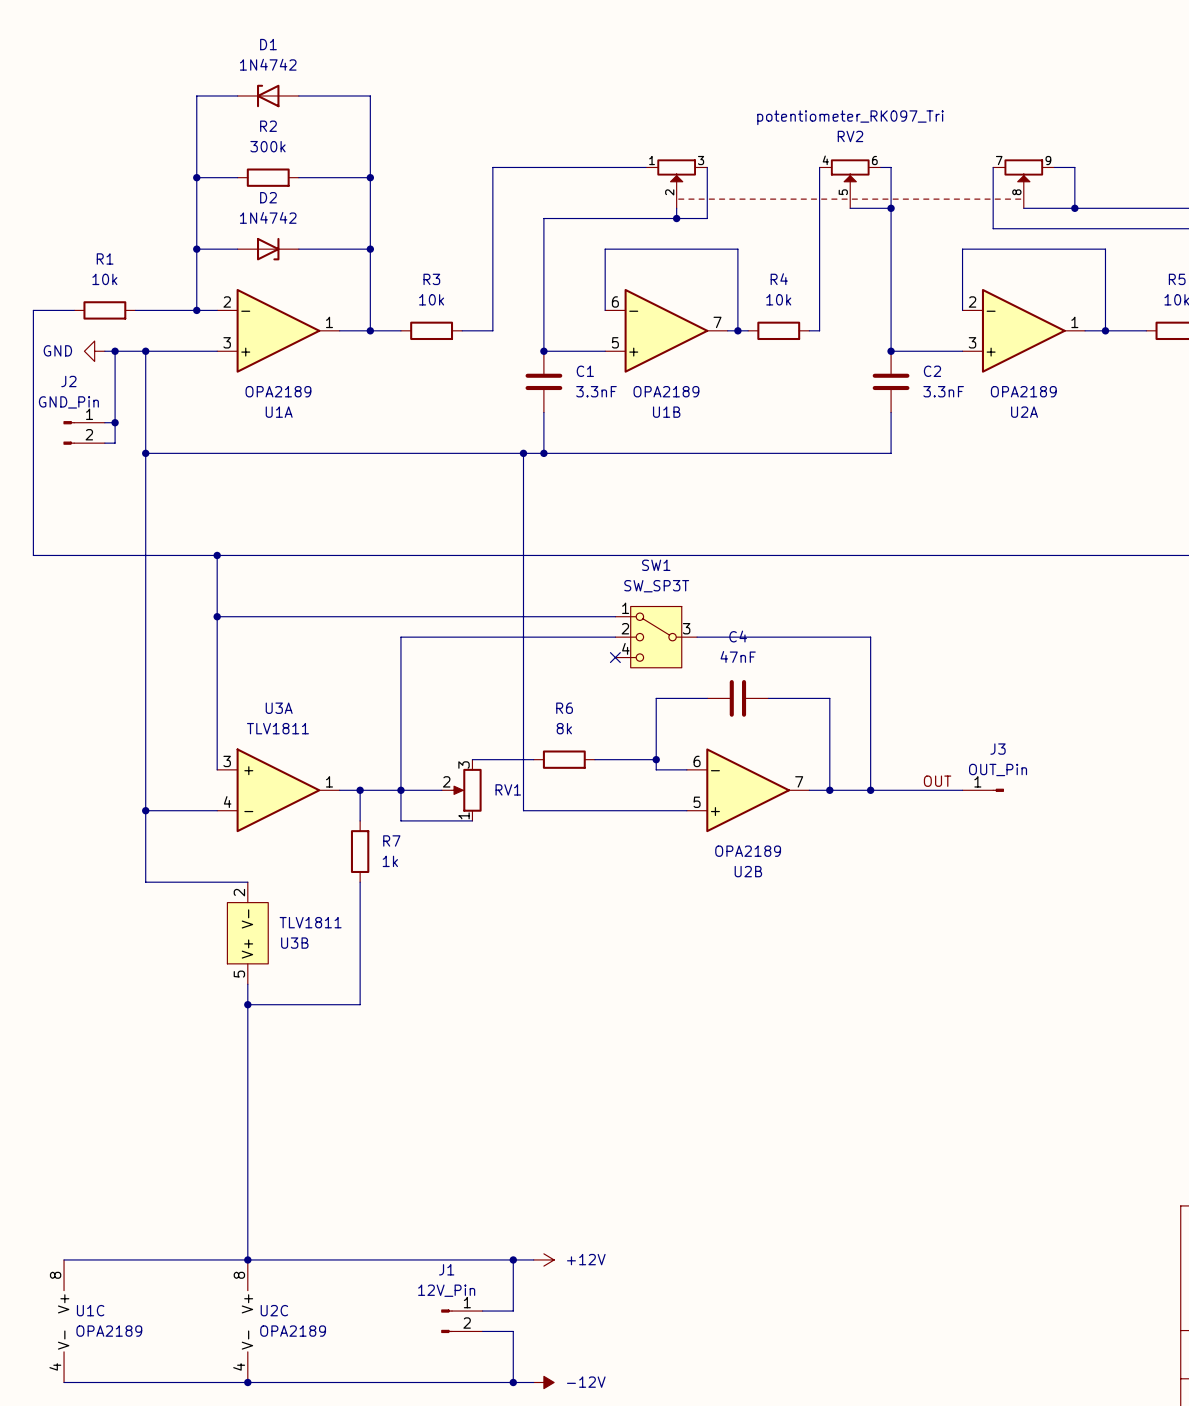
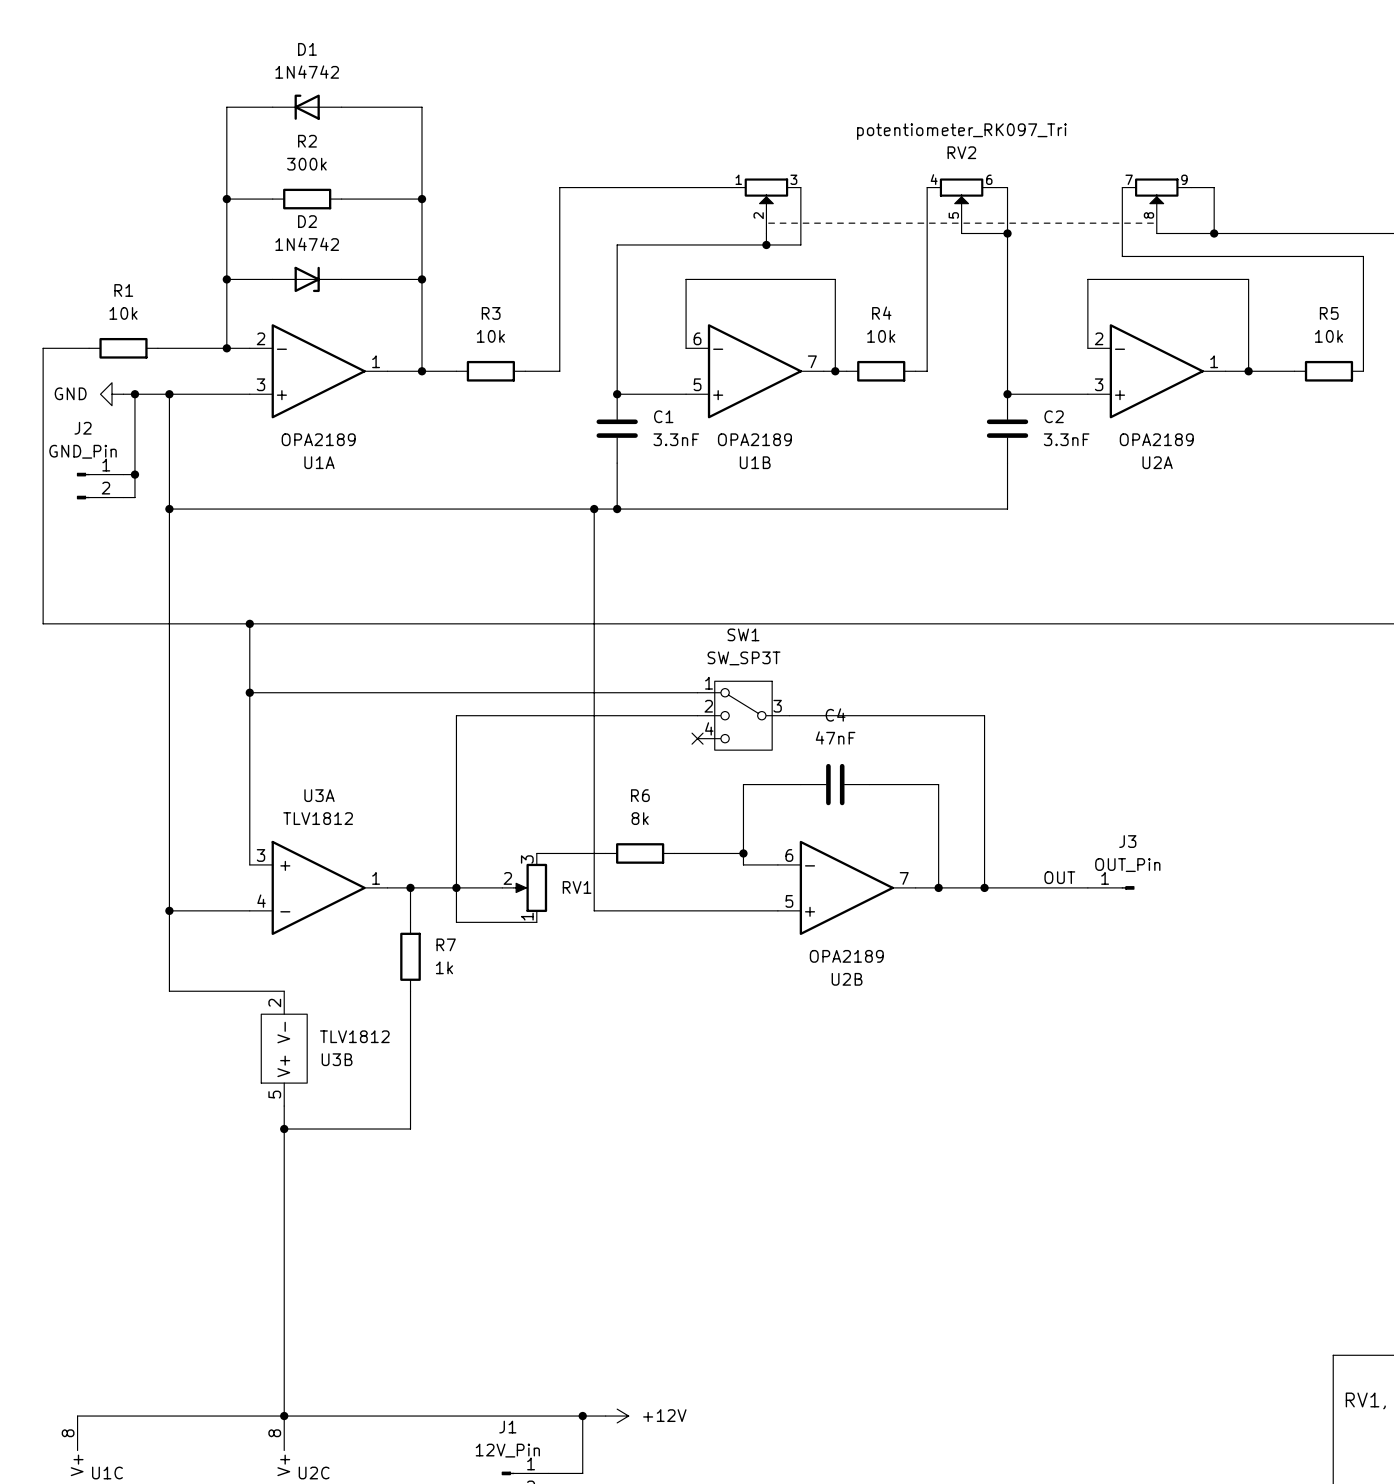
U3A text: TLV1811 (277, 728) -> TLV1812 (318, 818)
U3B text: TLV1811 (310, 922) -> TLV1812 (354, 1036)

